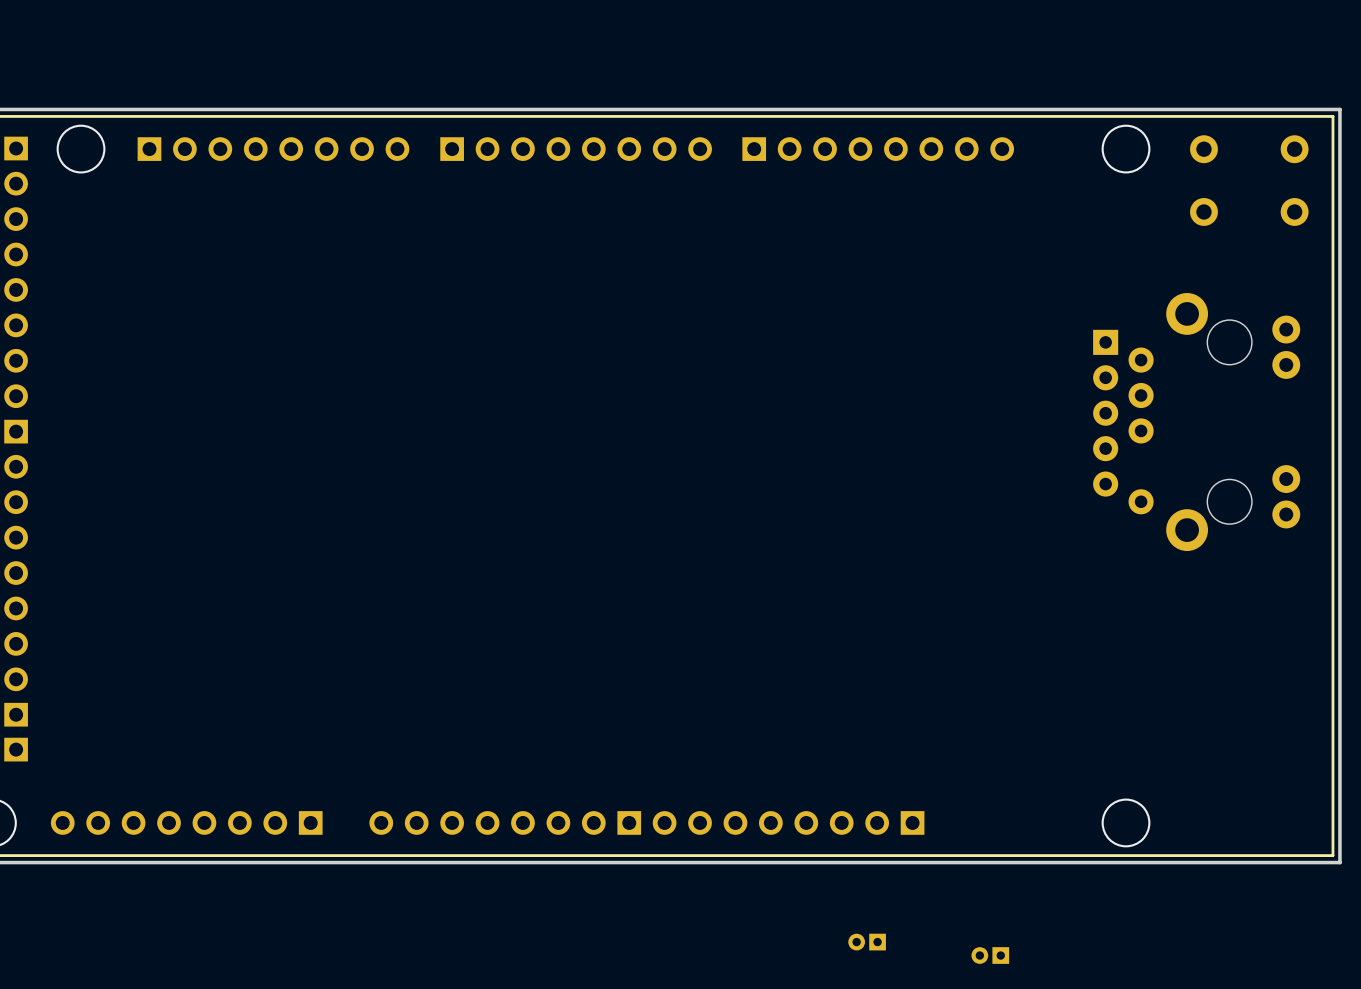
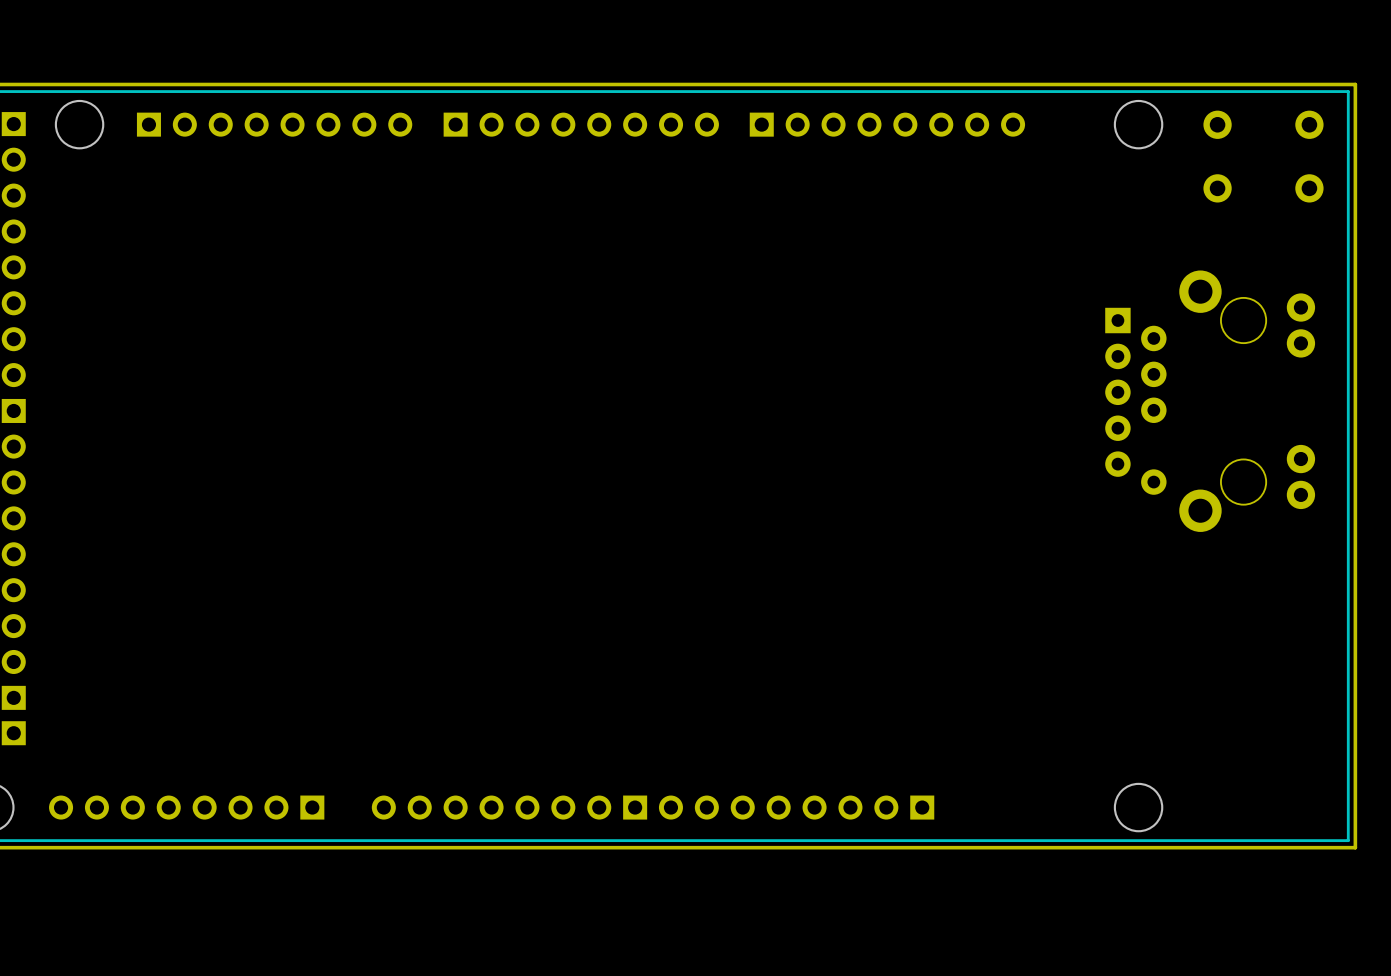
part: (867, 942) -> none
part: (990, 955) -> none

